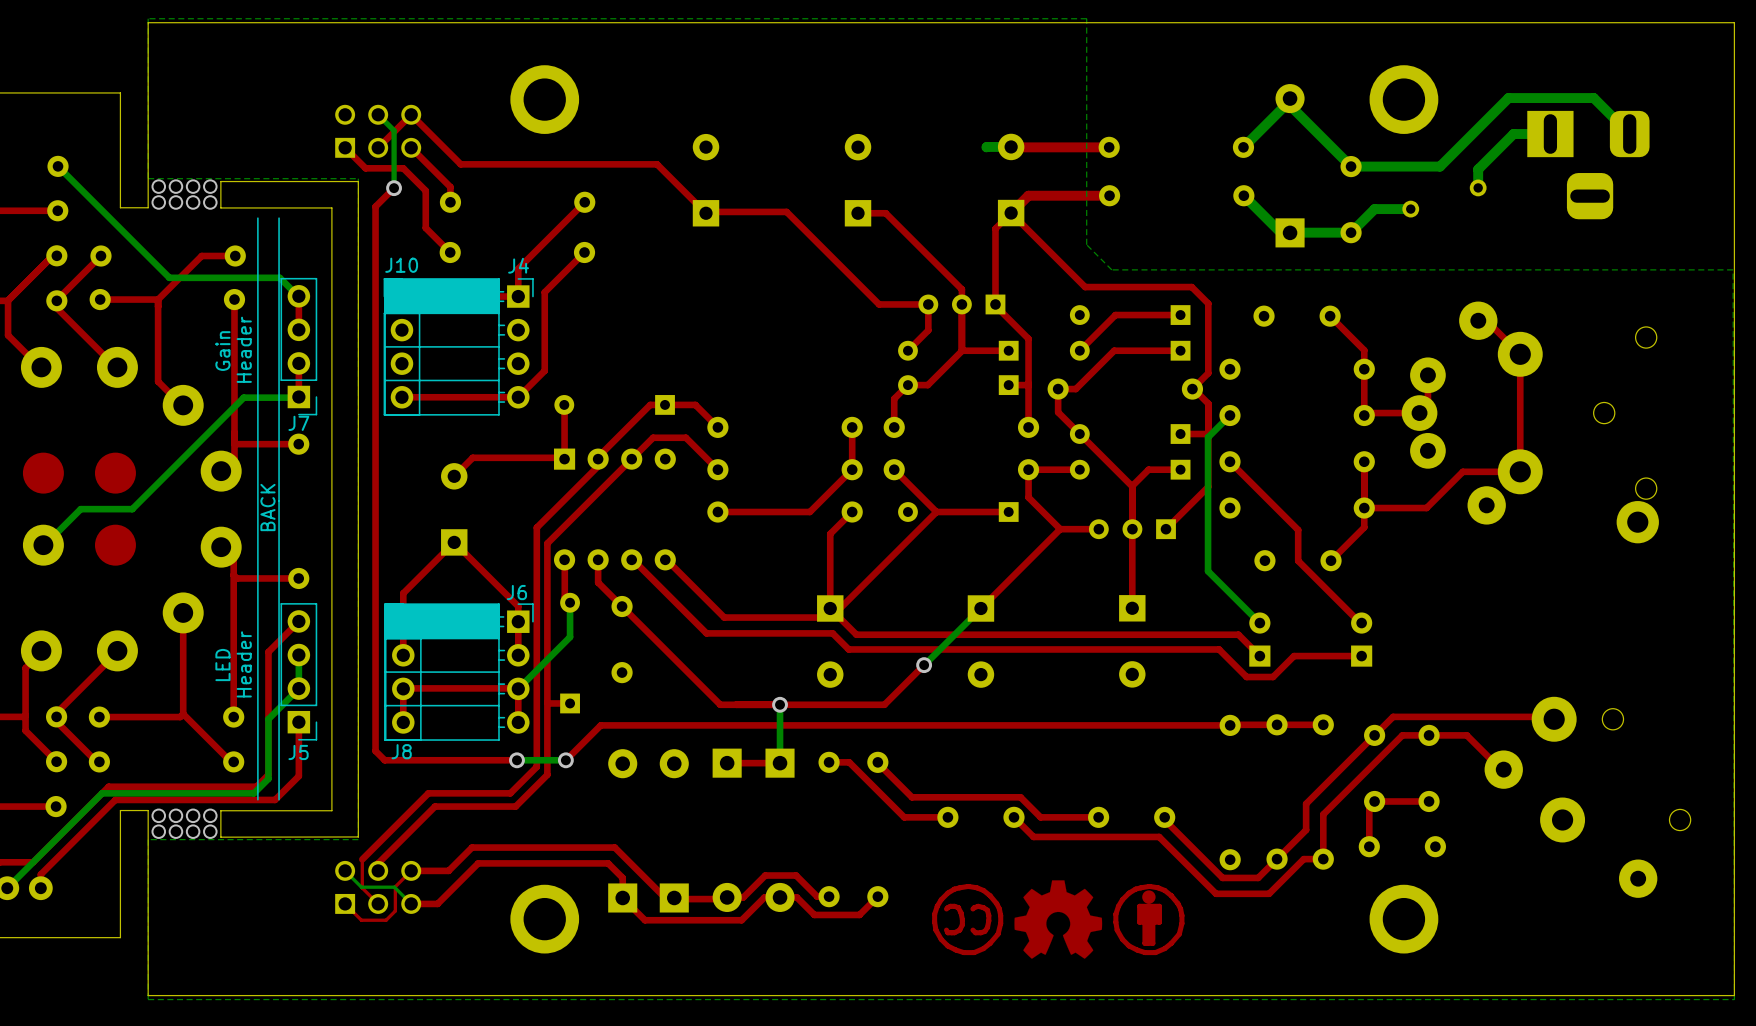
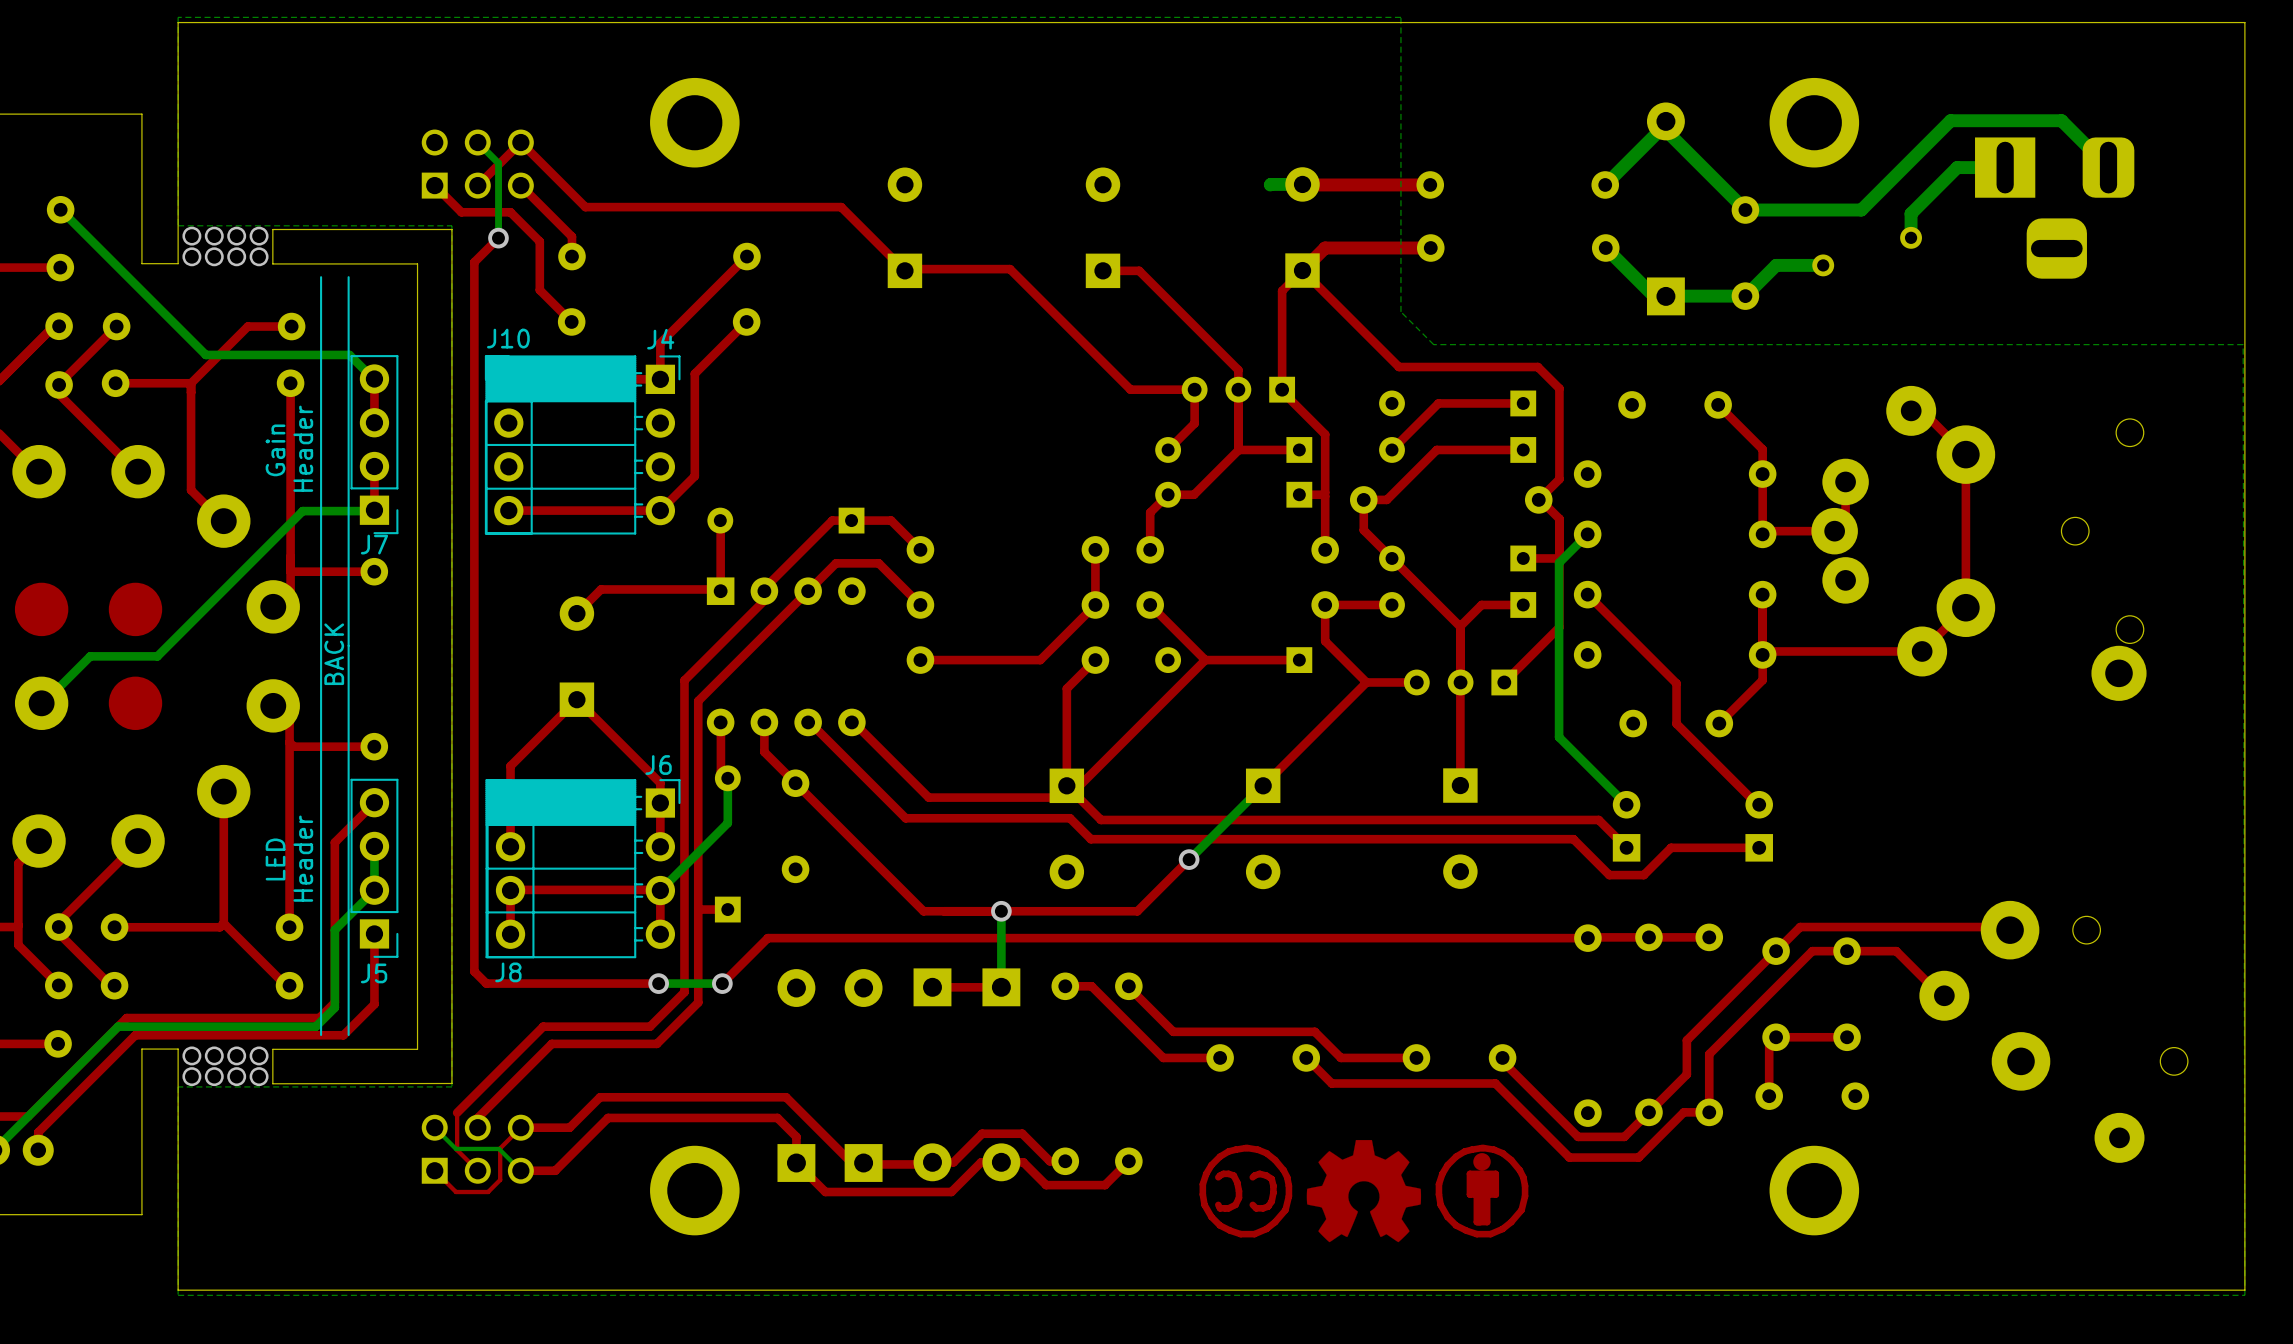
top track: (1520, 471) (1462, 471) (1426, 508) (1364, 508) -> (1965, 607) (1922, 651) (1762, 651)

